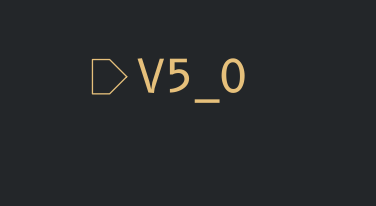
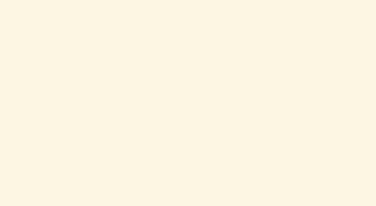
hierarchical label: V5_0 (191, 80) -> none

